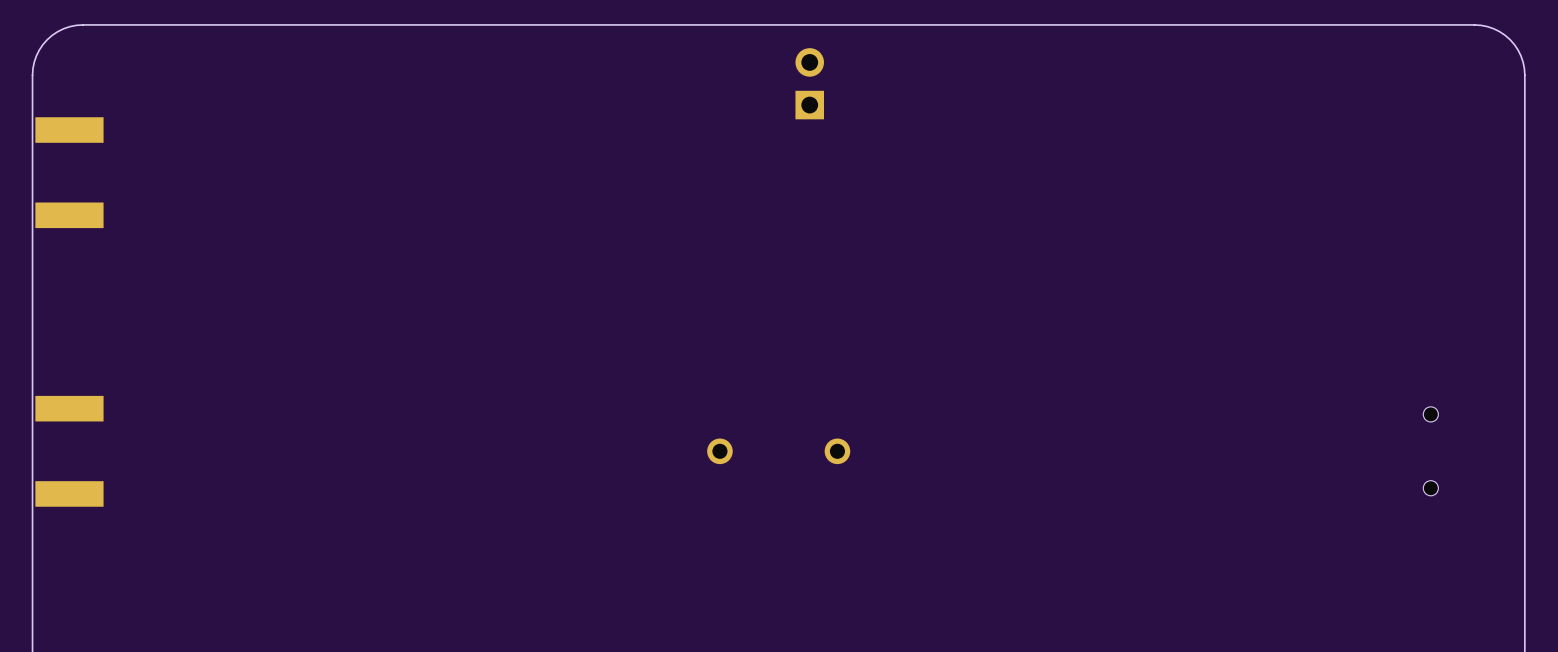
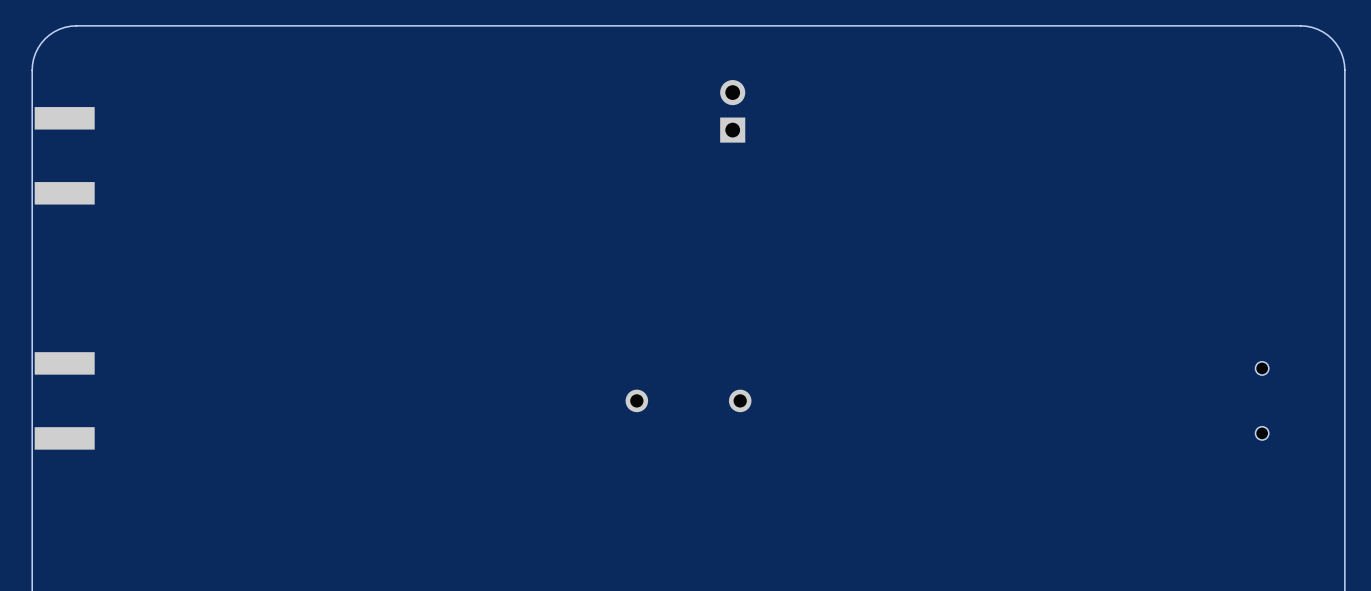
part position: (809, 83) -> (732, 111)

